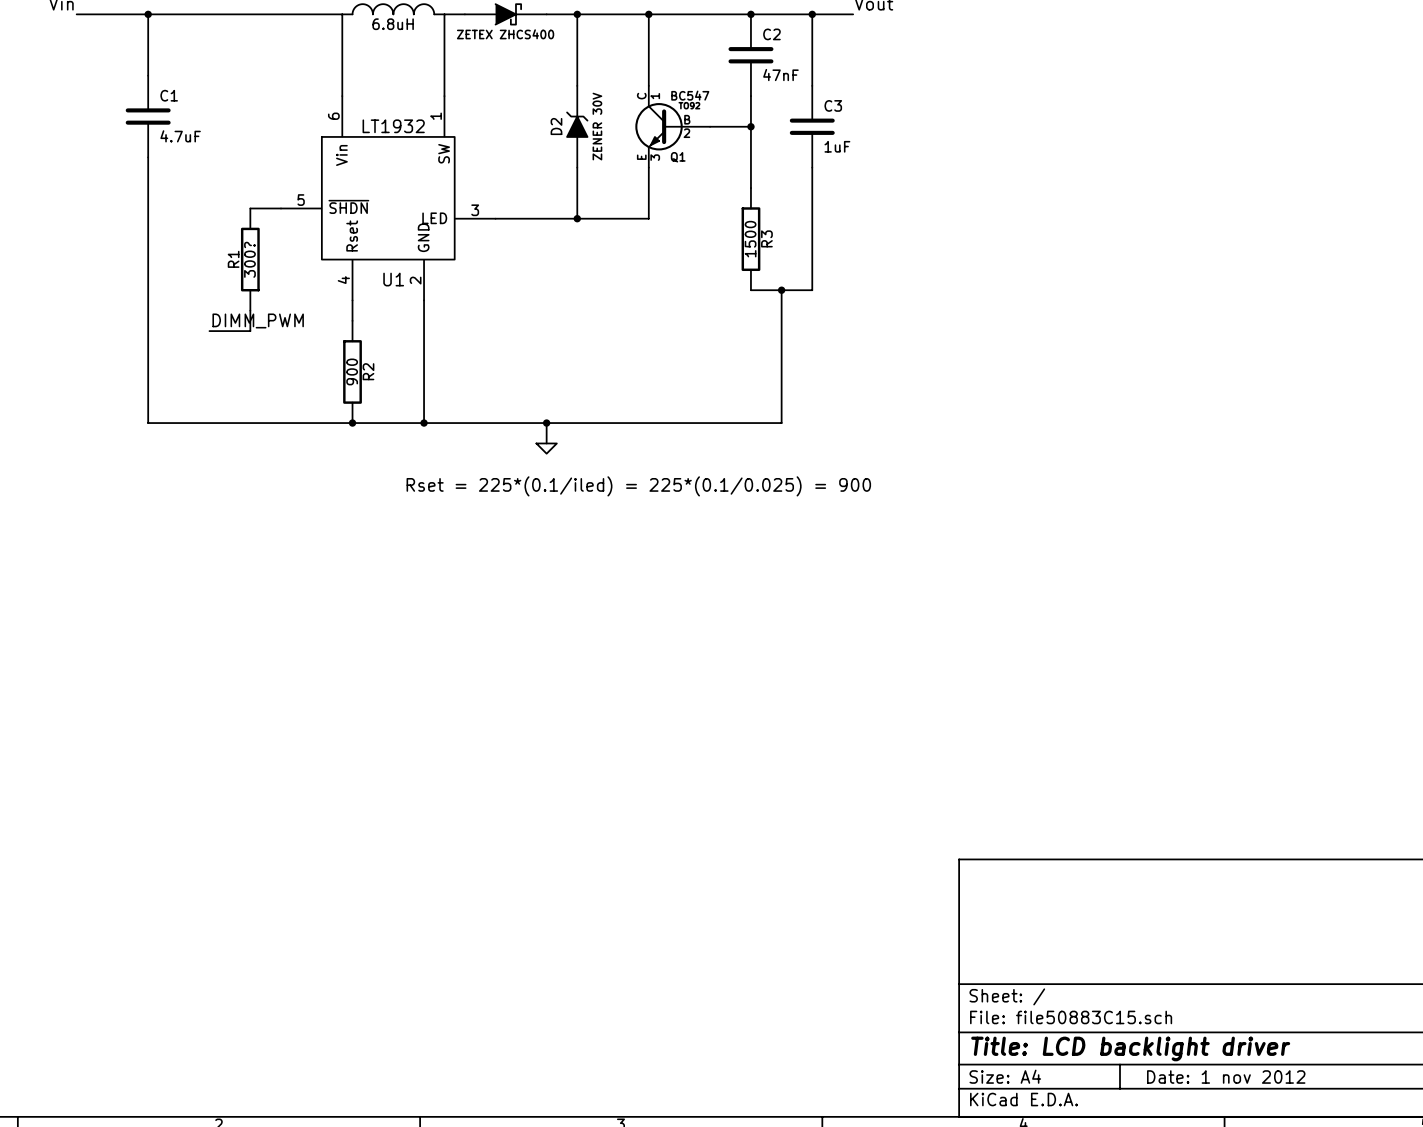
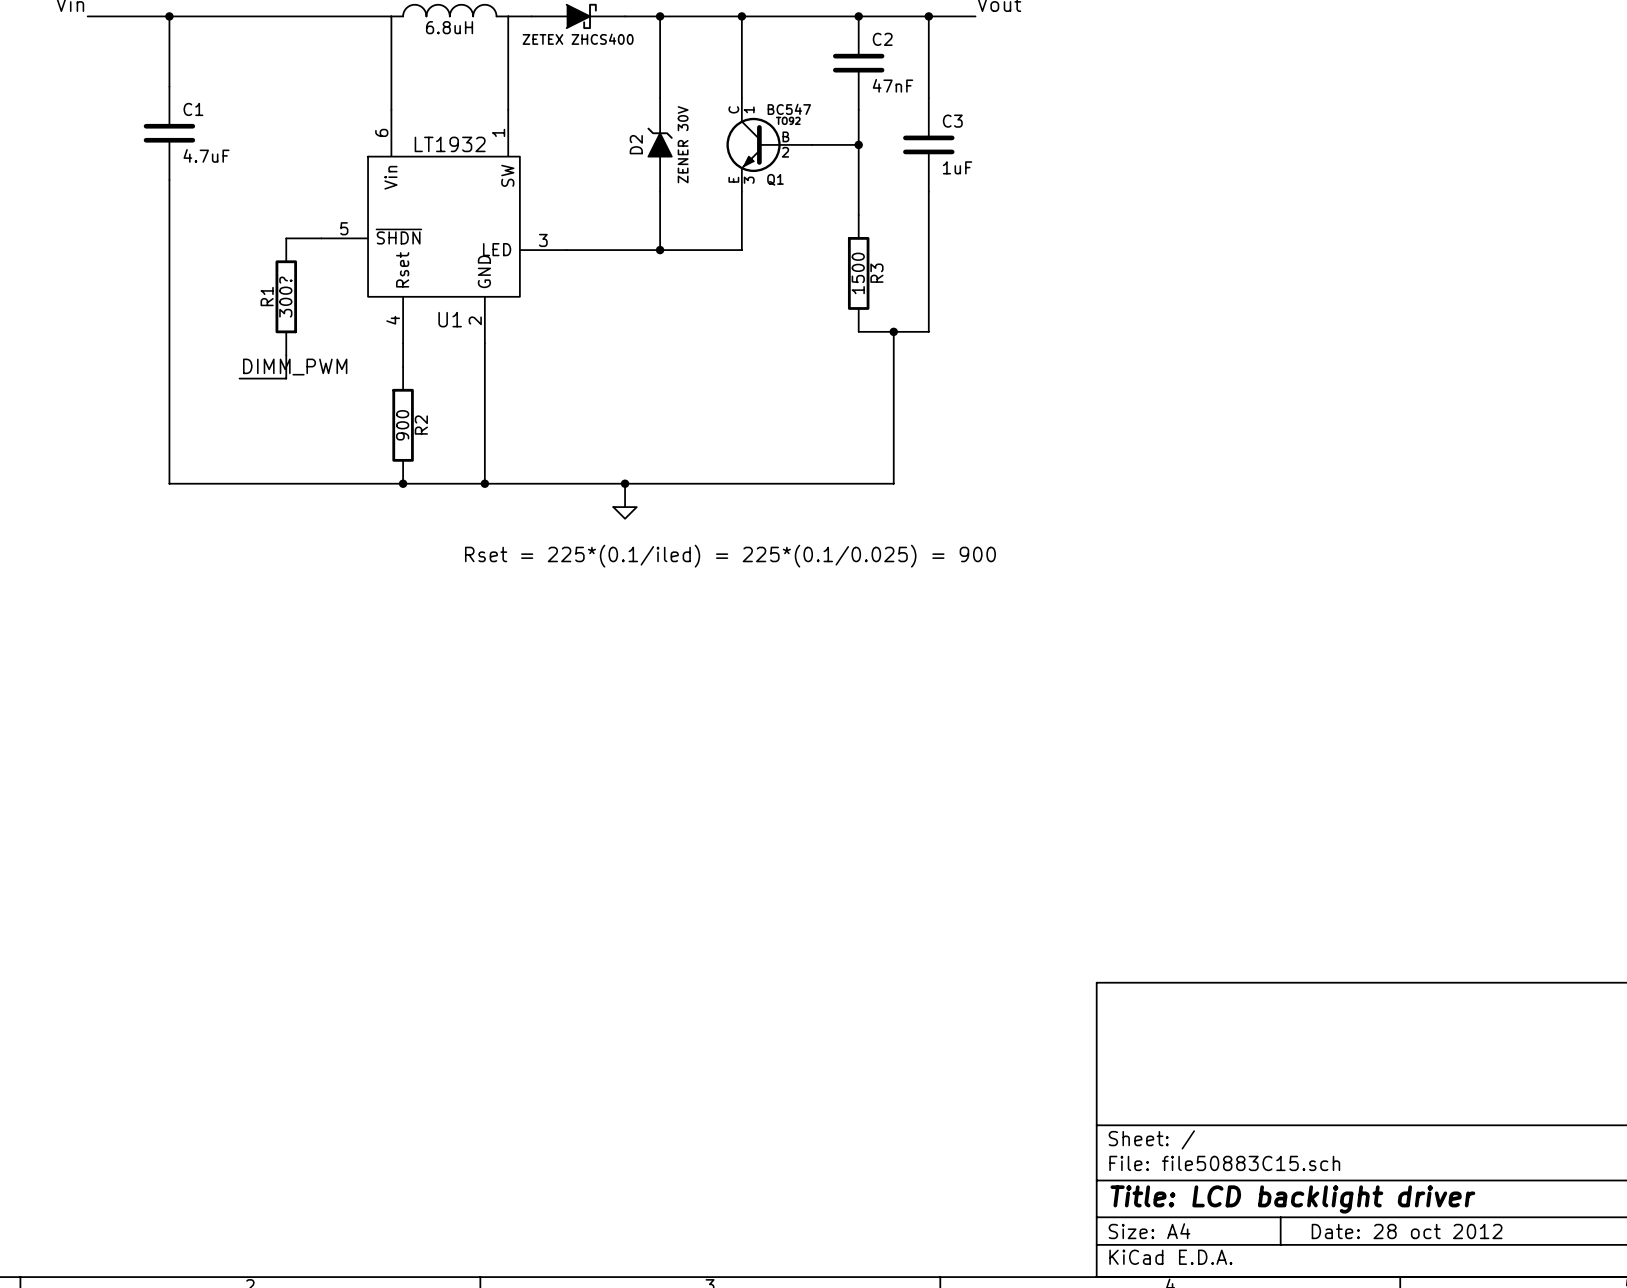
title block: Date: 1 nov 2012 (1226, 1077) -> Date: 28 oct 2012 (1407, 1231)

